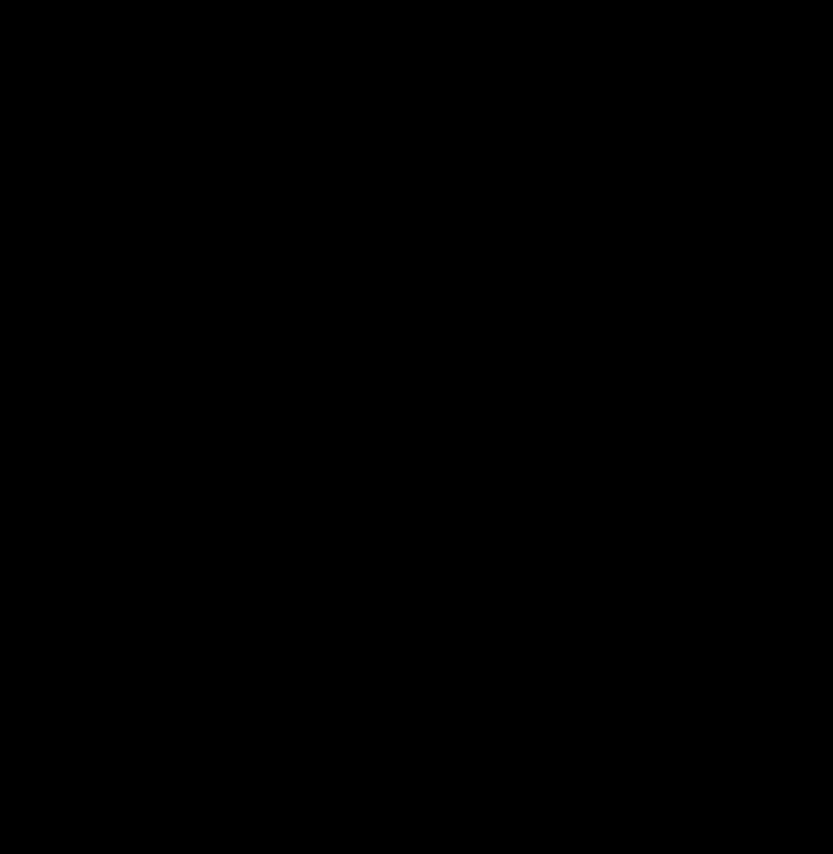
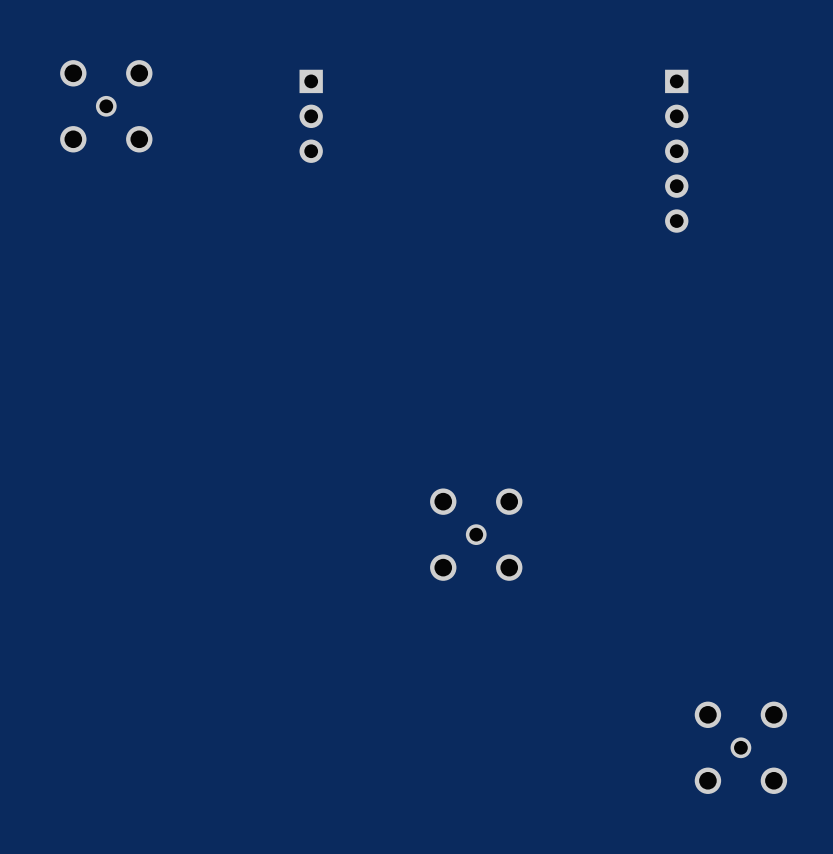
part: none -> (106, 106)
part: none -> (311, 116)
part: none -> (676, 151)
part: none -> (476, 534)
part: none -> (740, 747)

